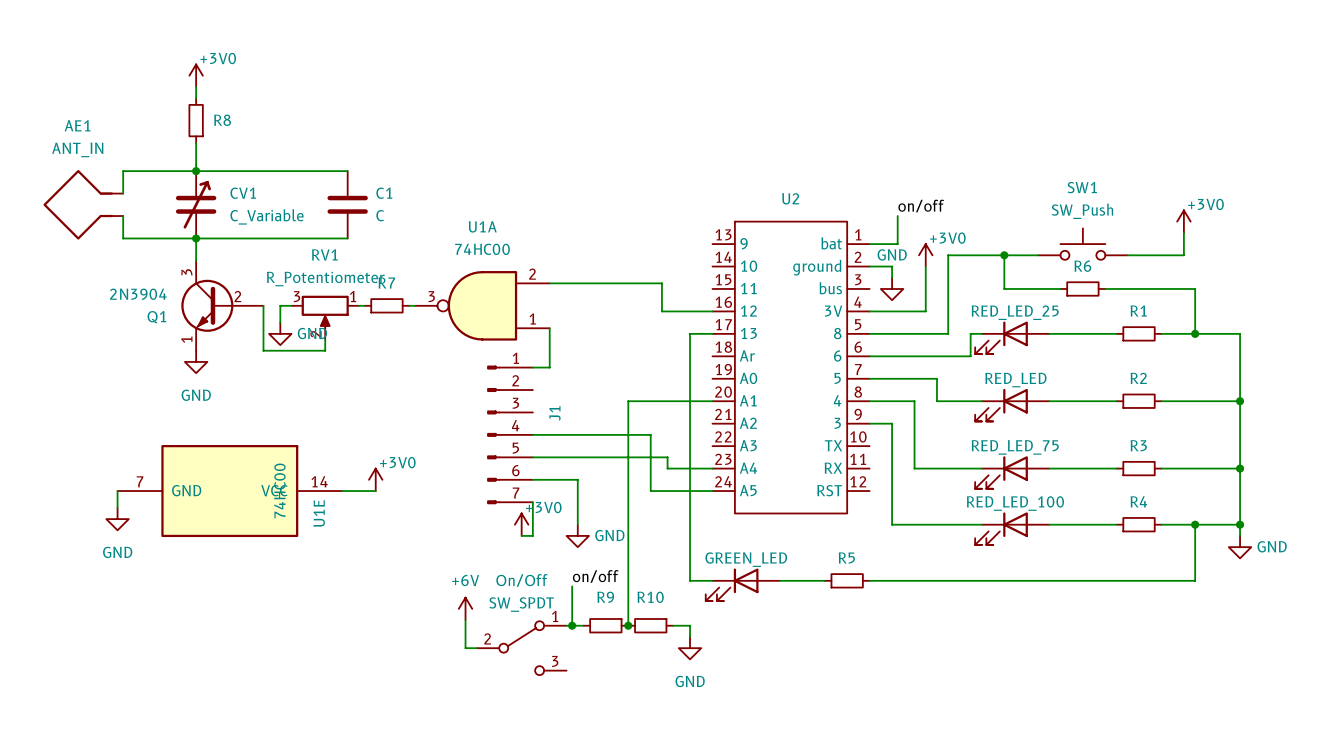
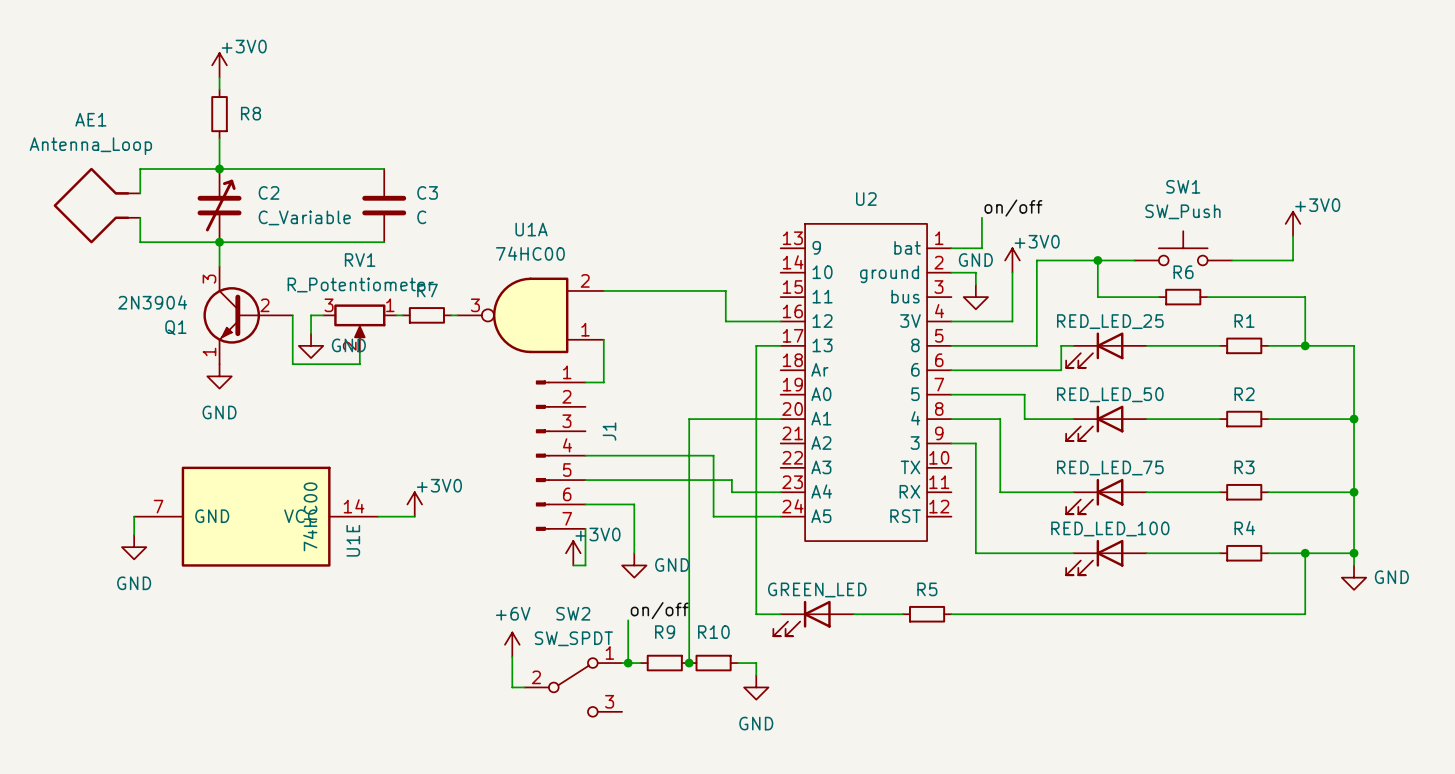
AE1 value: ANT_IN (77, 149) -> Antenna_Loop (90, 146)
CV1 name: CV1 (243, 193) -> C2 (269, 192)
C1 name: C1 (384, 193) -> C3 (427, 192)
part value: RED_LED (1015, 380) -> RED_LED_50 (1110, 394)
On/Off name: On/Off (522, 580) -> SW2 (573, 613)

